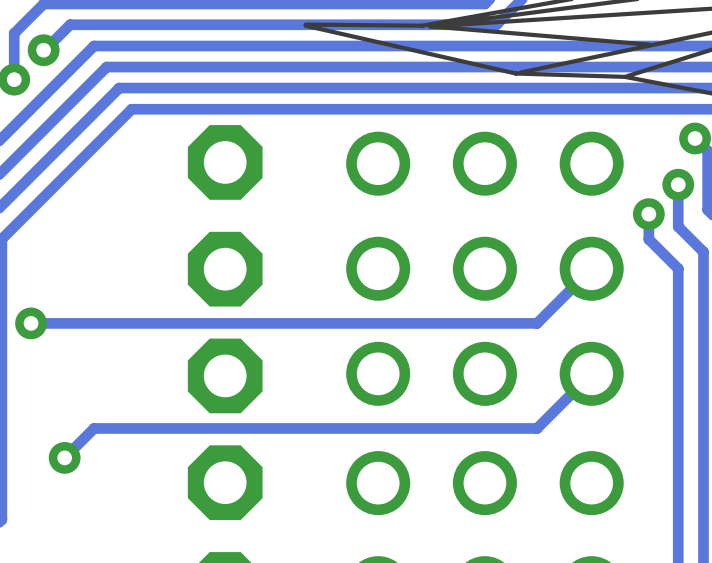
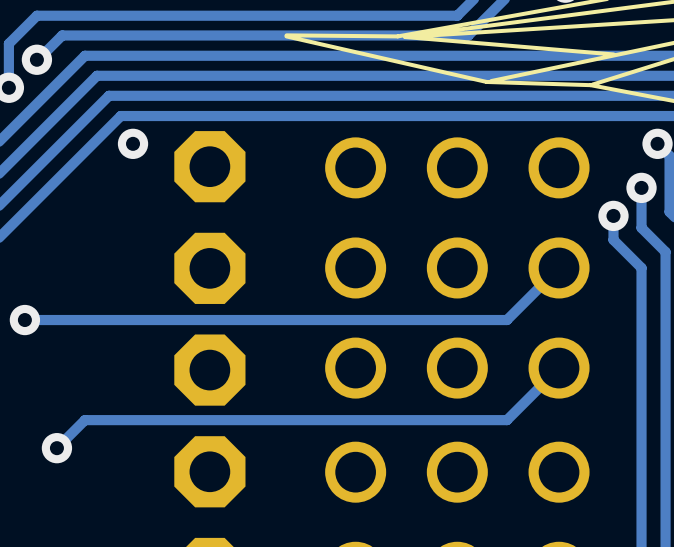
via: none -> (133, 143)

